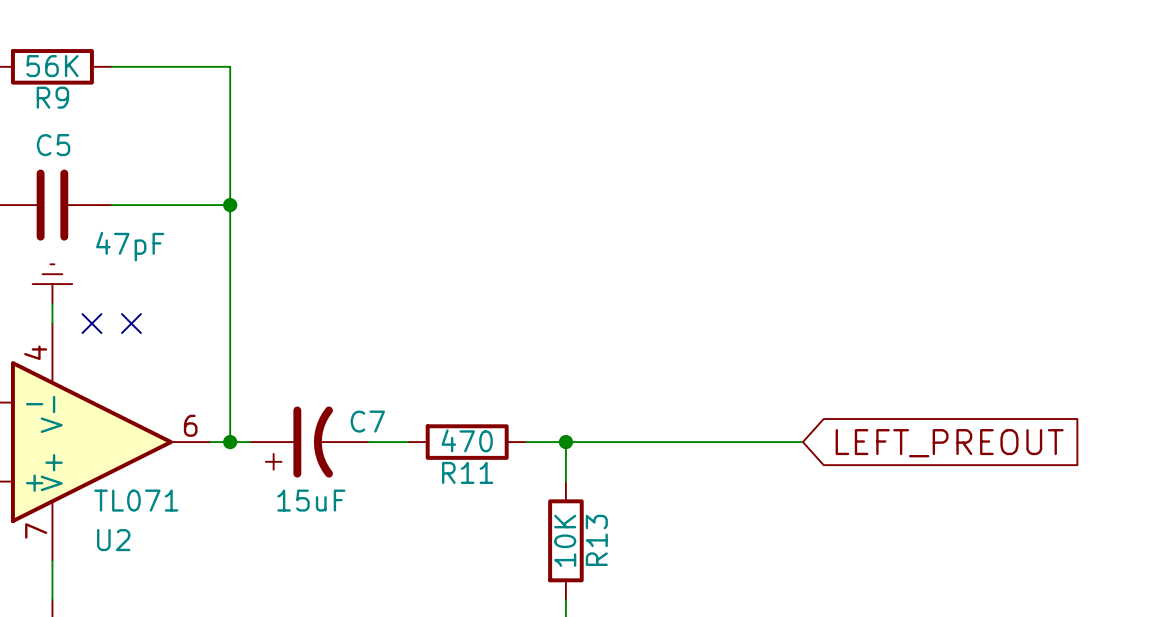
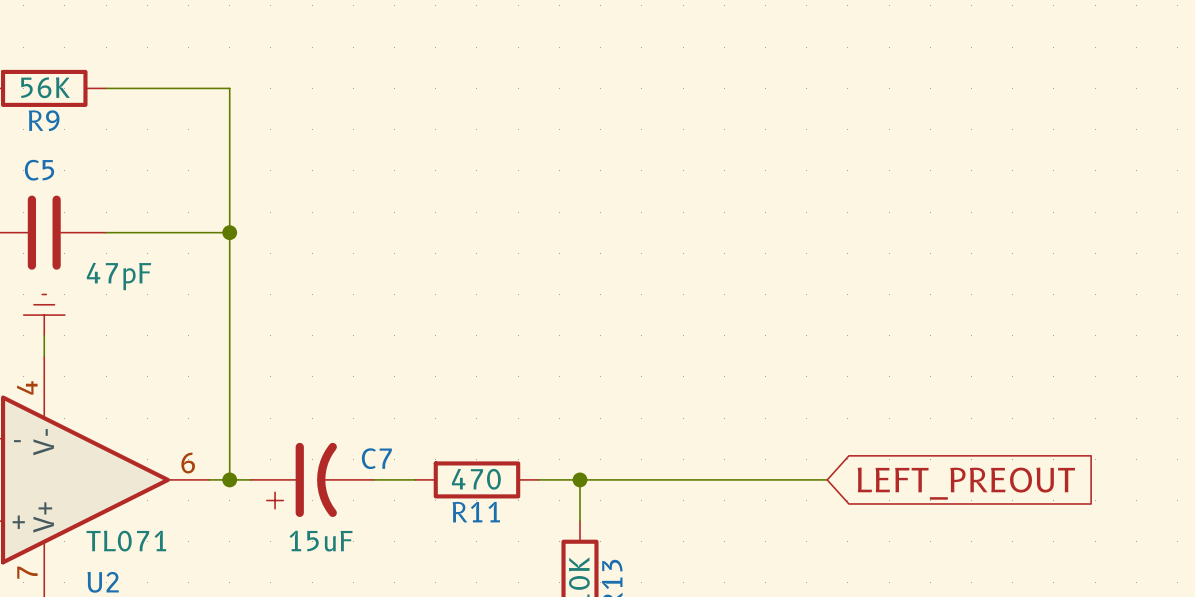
no-connect mark: (91, 323) -> none
no-connect mark: (131, 323) -> none

